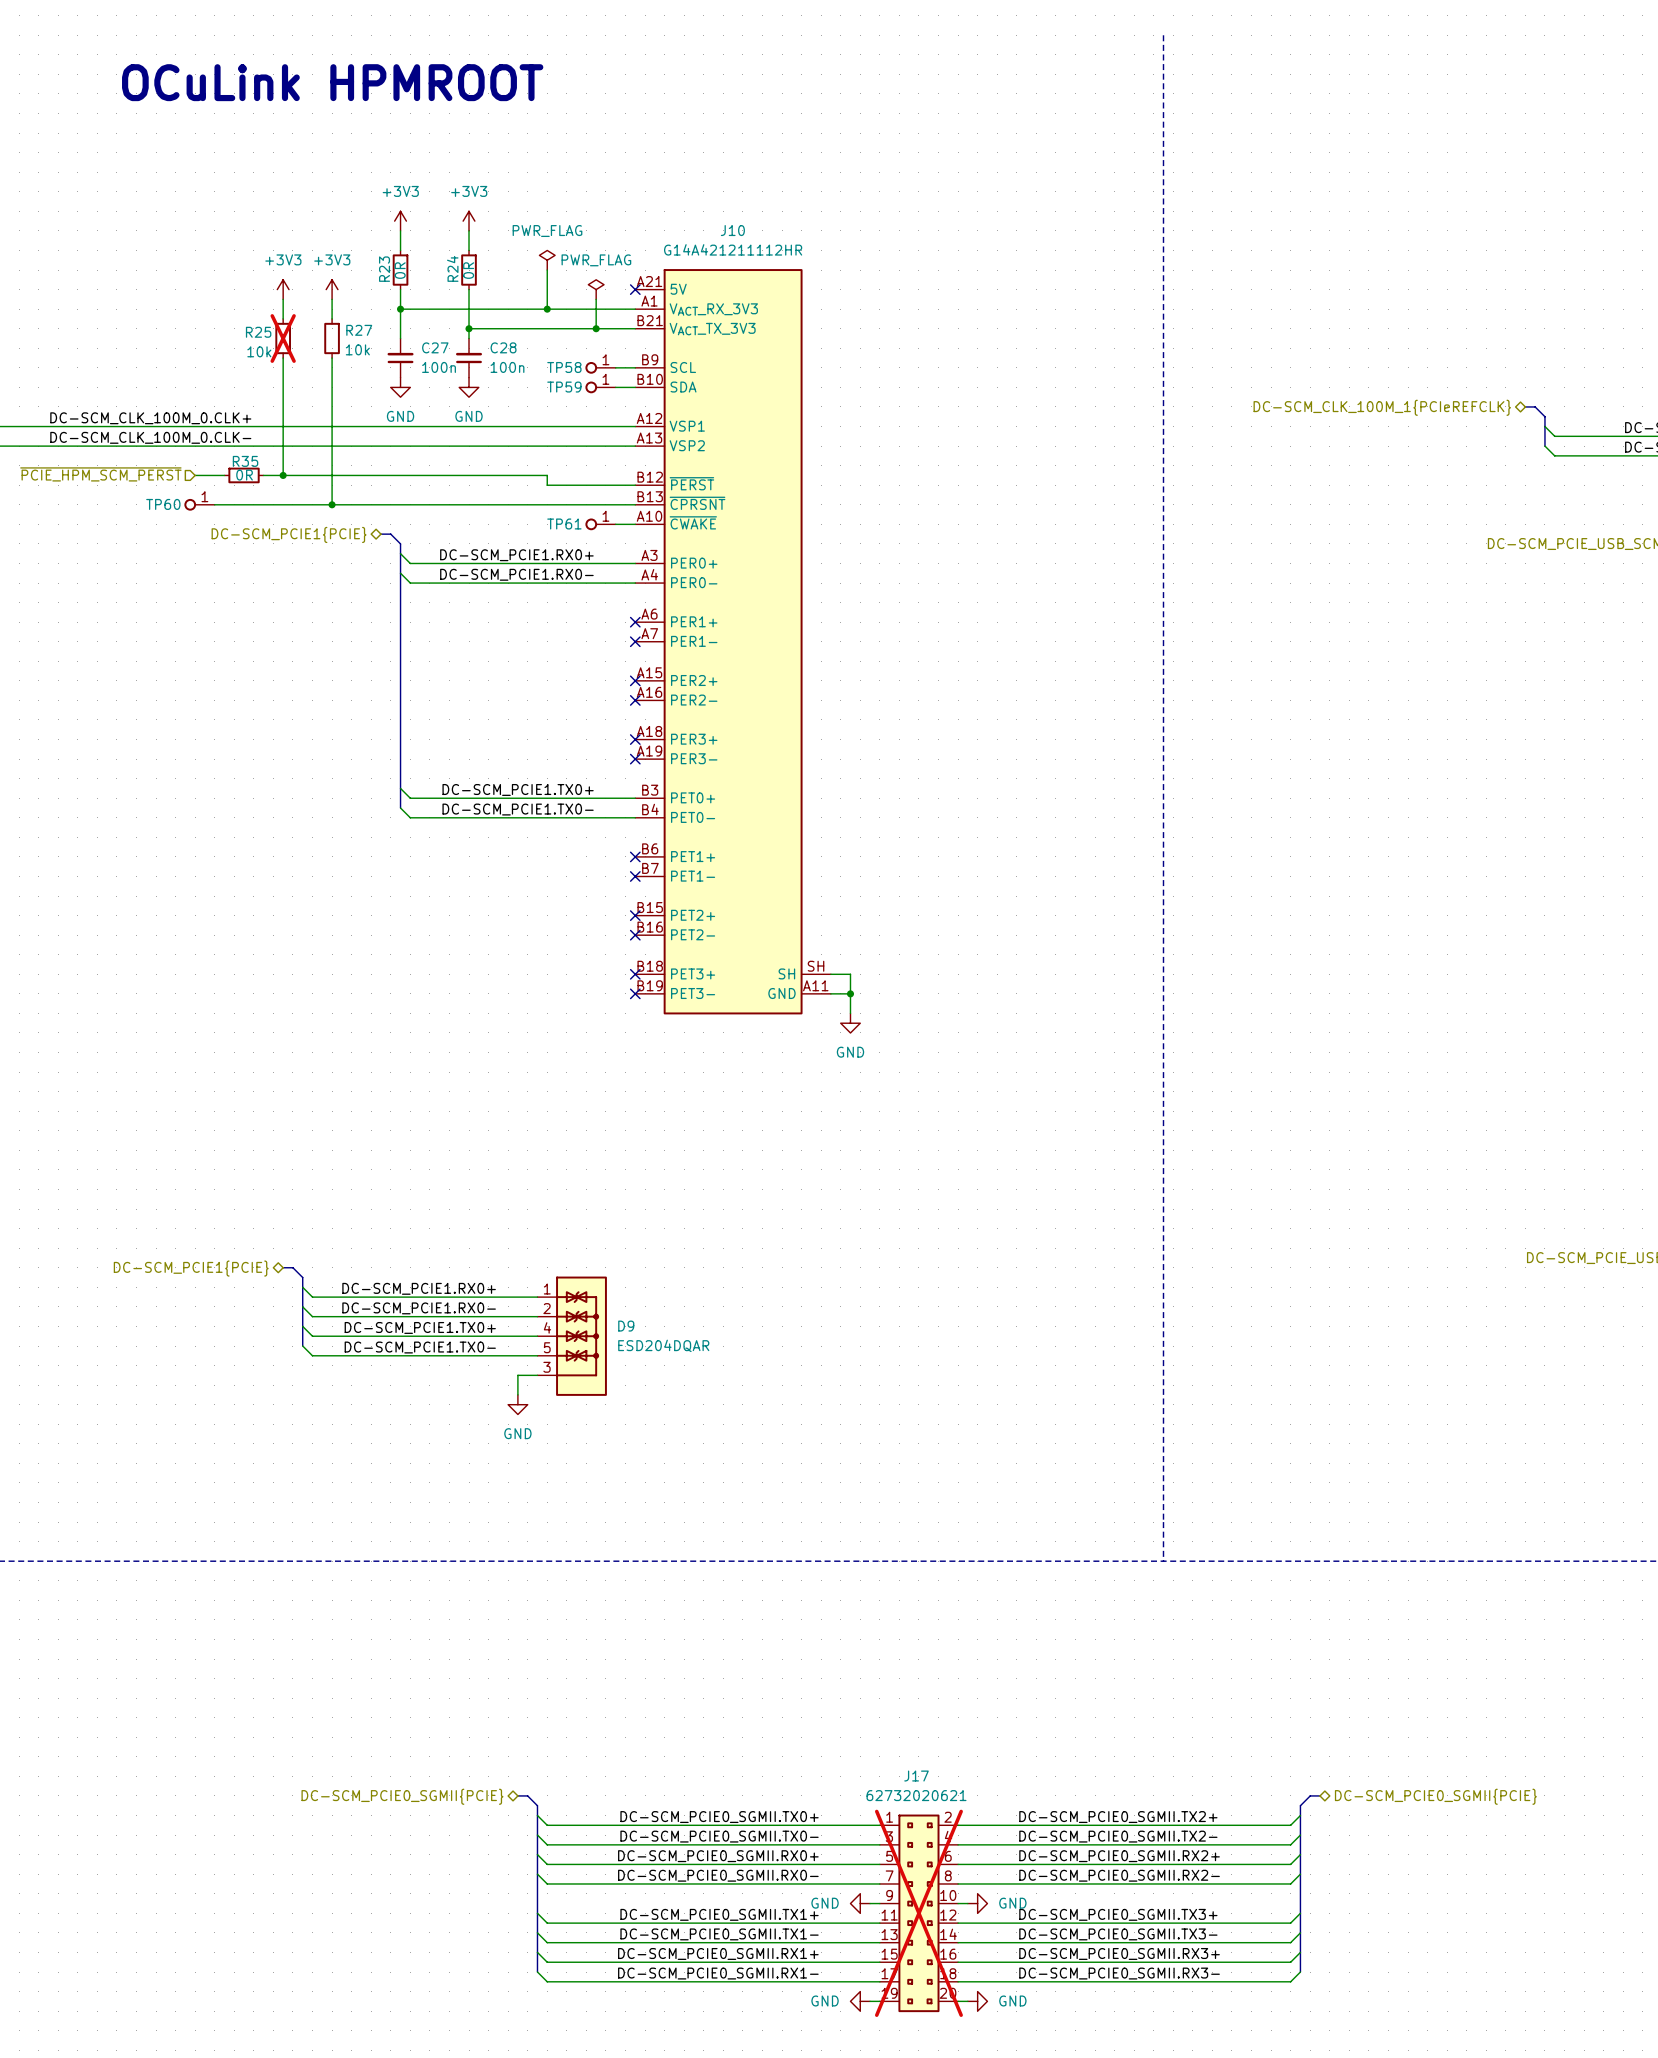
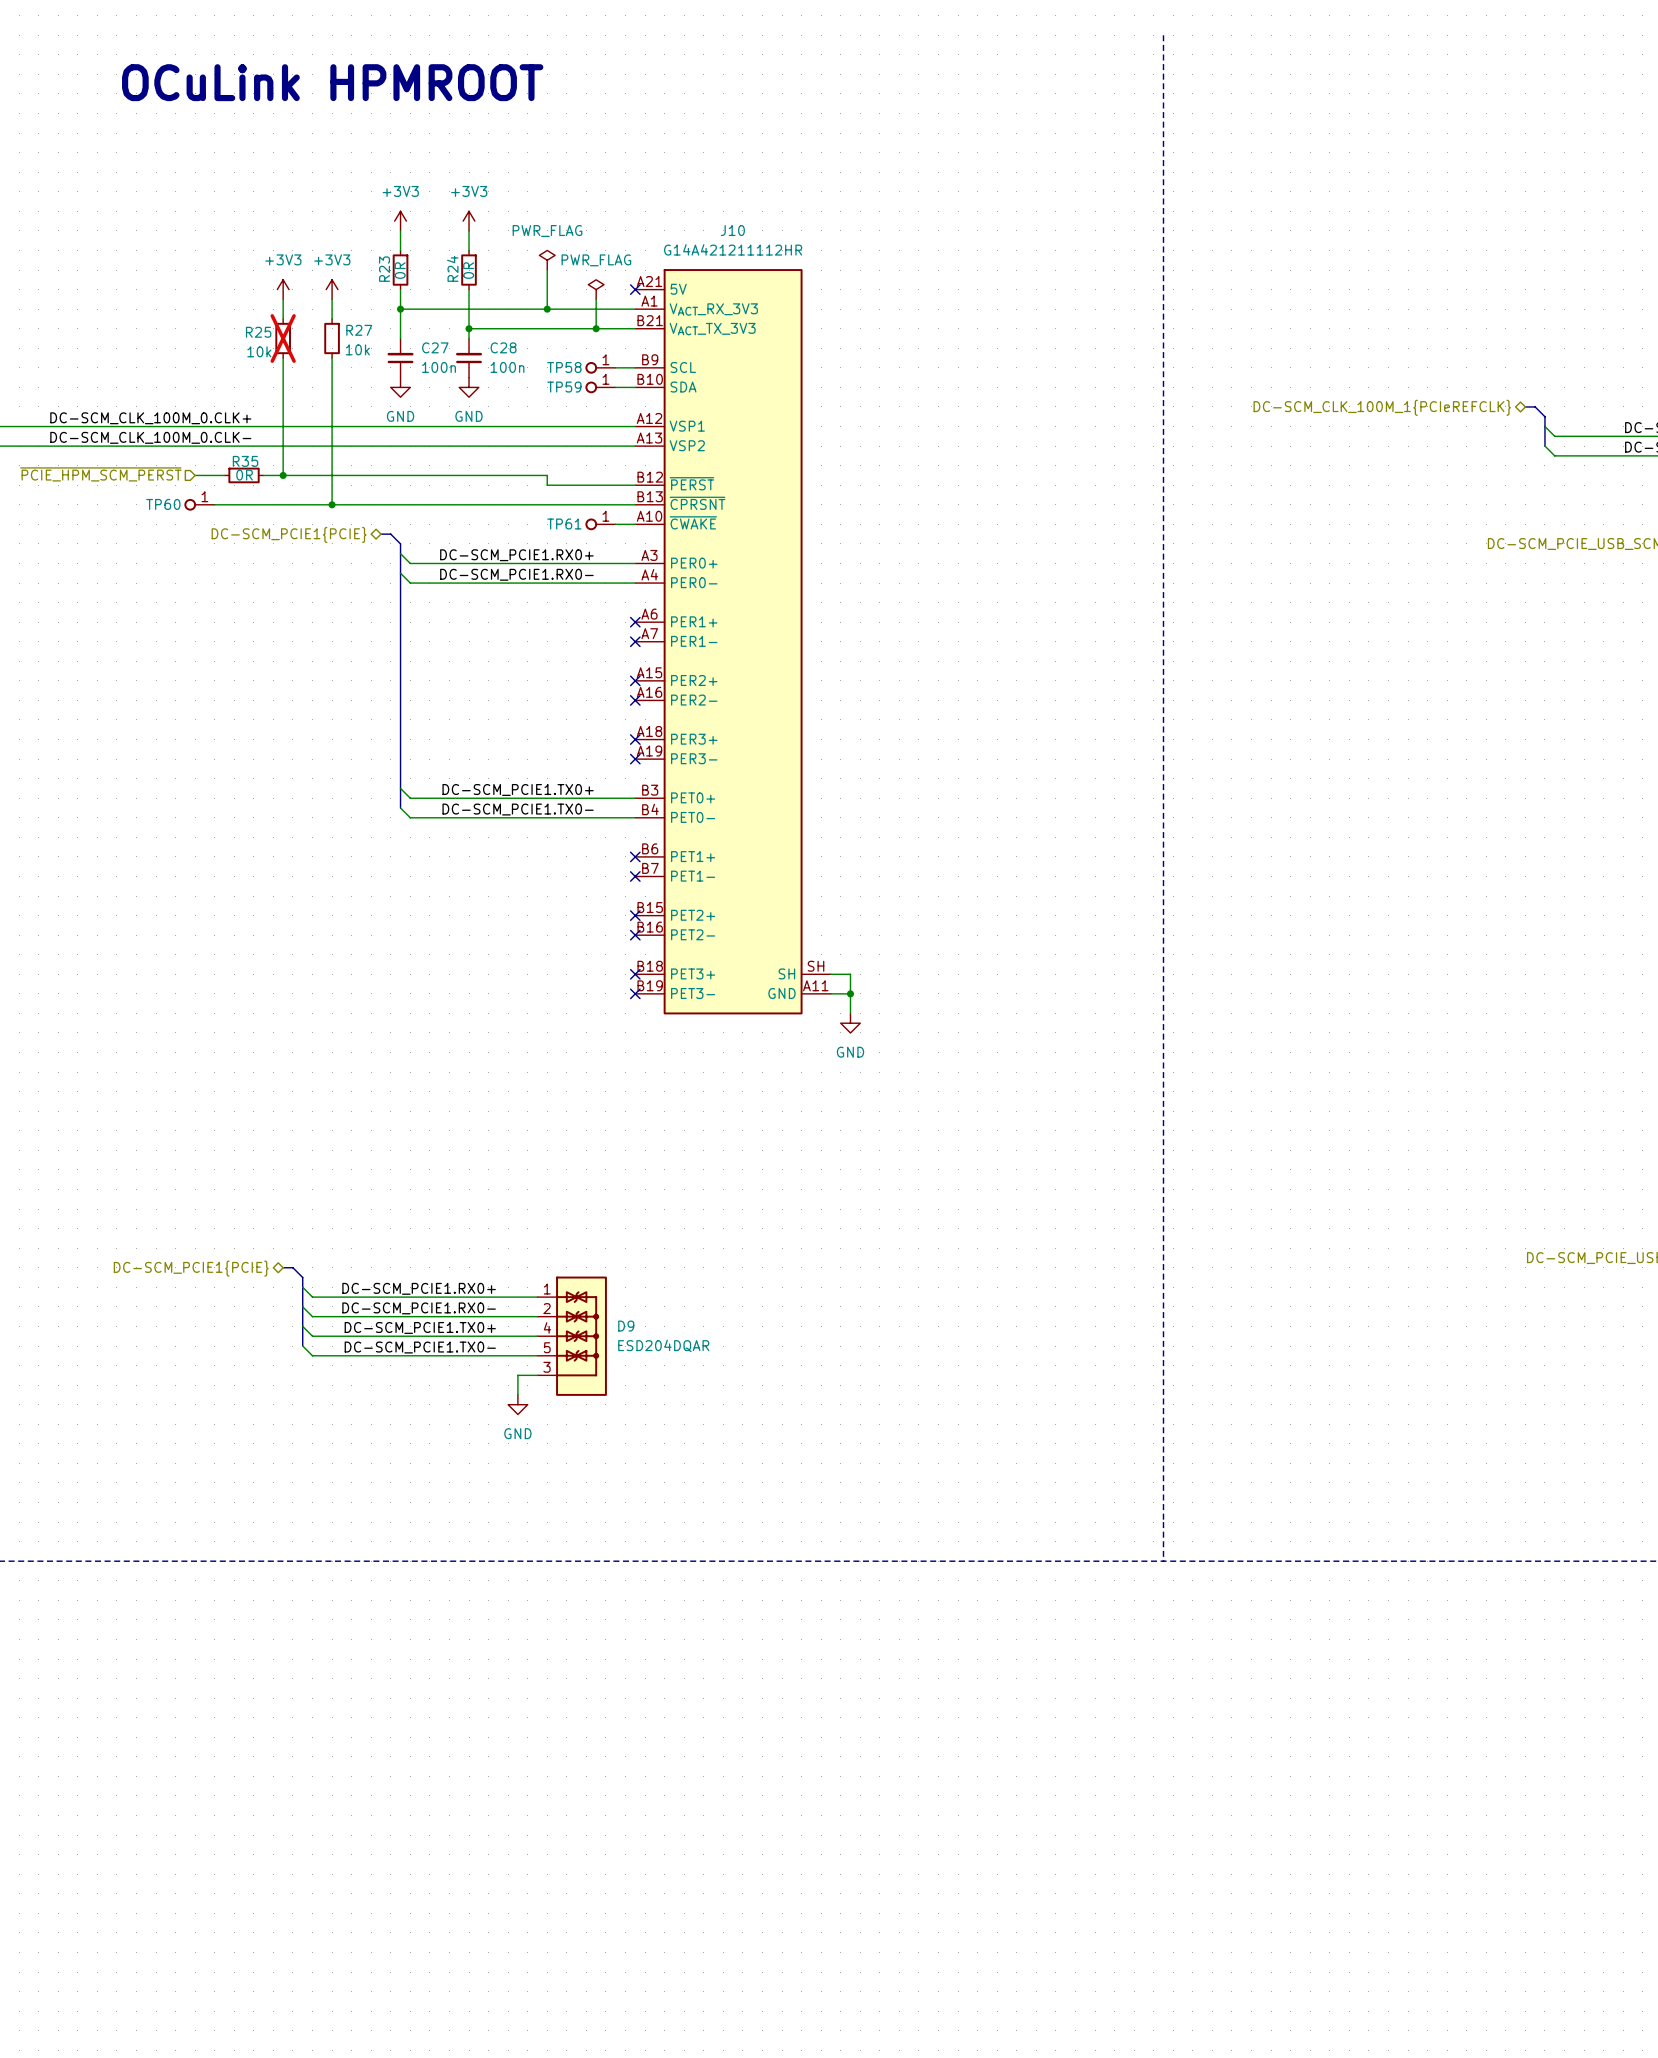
bus: (517, 1795) (527, 1795) (537, 1805) (537, 1972) -> none
bus: (1320, 1795) (1310, 1795) (1300, 1805) (1300, 1972) -> none
hierarchical label: DC-SCM_PCIE0_SGMII{PCIE} (402, 1796) -> none
hierarchical label: DC-SCM_PCIE0_SGMII{PCIE} (1435, 1796) -> none
wire: (537, 1815) (547, 1825) (879, 1825) -> none
wire: (1300, 1815) (1290, 1825) (958, 1825) -> none
label: DC-SCM_PCIE0_SGMII.TX0+ (719, 1817) -> none
label: DC-SCM_PCIE0_SGMII.TX2+ (1118, 1817) -> none
wire: (537, 1835) (547, 1844) (879, 1844) -> none
wire: (1300, 1835) (1290, 1844) (958, 1844) -> none
label: DC-SCM_PCIE0_SGMII.TX0- (719, 1836) -> none
label: DC-SCM_PCIE0_SGMII.TX2- (1118, 1836) -> none
wire: (537, 1854) (547, 1864) (879, 1864) -> none
wire: (1300, 1854) (1290, 1864) (958, 1864) -> none
label: DC-SCM_PCIE0_SGMII.RX0+ (718, 1856) -> none
label: DC-SCM_PCIE0_SGMII.RX2+ (1119, 1856) -> none
wire: (537, 1874) (547, 1883) (879, 1883) -> none
wire: (1300, 1874) (1290, 1883) (958, 1883) -> none
label: DC-SCM_PCIE0_SGMII.RX0- (718, 1875) -> none
label: DC-SCM_PCIE0_SGMII.RX2- (1119, 1875) -> none
power symbol: GND (860, 1903) -> none
wire: (870, 1903) (879, 1903) -> none
wire: (958, 1903) (967, 1903) -> none
power symbol: GND (977, 1903) -> none
wire: (537, 1913) (547, 1923) (879, 1923) -> none
J17: (918, 1913) -> none
wire: (1300, 1913) (1290, 1923) (958, 1923) -> none
label: DC-SCM_PCIE0_SGMII.TX1+ (719, 1914) -> none
label: DC-SCM_PCIE0_SGMII.TX3+ (1118, 1914) -> none
wire: (537, 1932) (547, 1942) (879, 1942) -> none
wire: (1300, 1932) (1290, 1942) (958, 1942) -> none
label: DC-SCM_PCIE0_SGMII.TX1- (719, 1934) -> none
label: DC-SCM_PCIE0_SGMII.TX3- (1118, 1934) -> none
wire: (537, 1952) (547, 1962) (879, 1962) -> none
wire: (1300, 1952) (1290, 1962) (958, 1962) -> none
label: DC-SCM_PCIE0_SGMII.RX1+ (718, 1953) -> none
label: DC-SCM_PCIE0_SGMII.RX3+ (1119, 1953) -> none
wire: (537, 1972) (547, 1981) (879, 1981) -> none
wire: (1300, 1972) (1290, 1981) (958, 1981) -> none
label: DC-SCM_PCIE0_SGMII.RX1- (718, 1973) -> none
label: DC-SCM_PCIE0_SGMII.RX3- (1119, 1973) -> none
power symbol: GND (860, 2001) -> none
wire: (870, 2001) (879, 2001) -> none
wire: (958, 2001) (967, 2001) -> none
power symbol: GND (977, 2001) -> none

